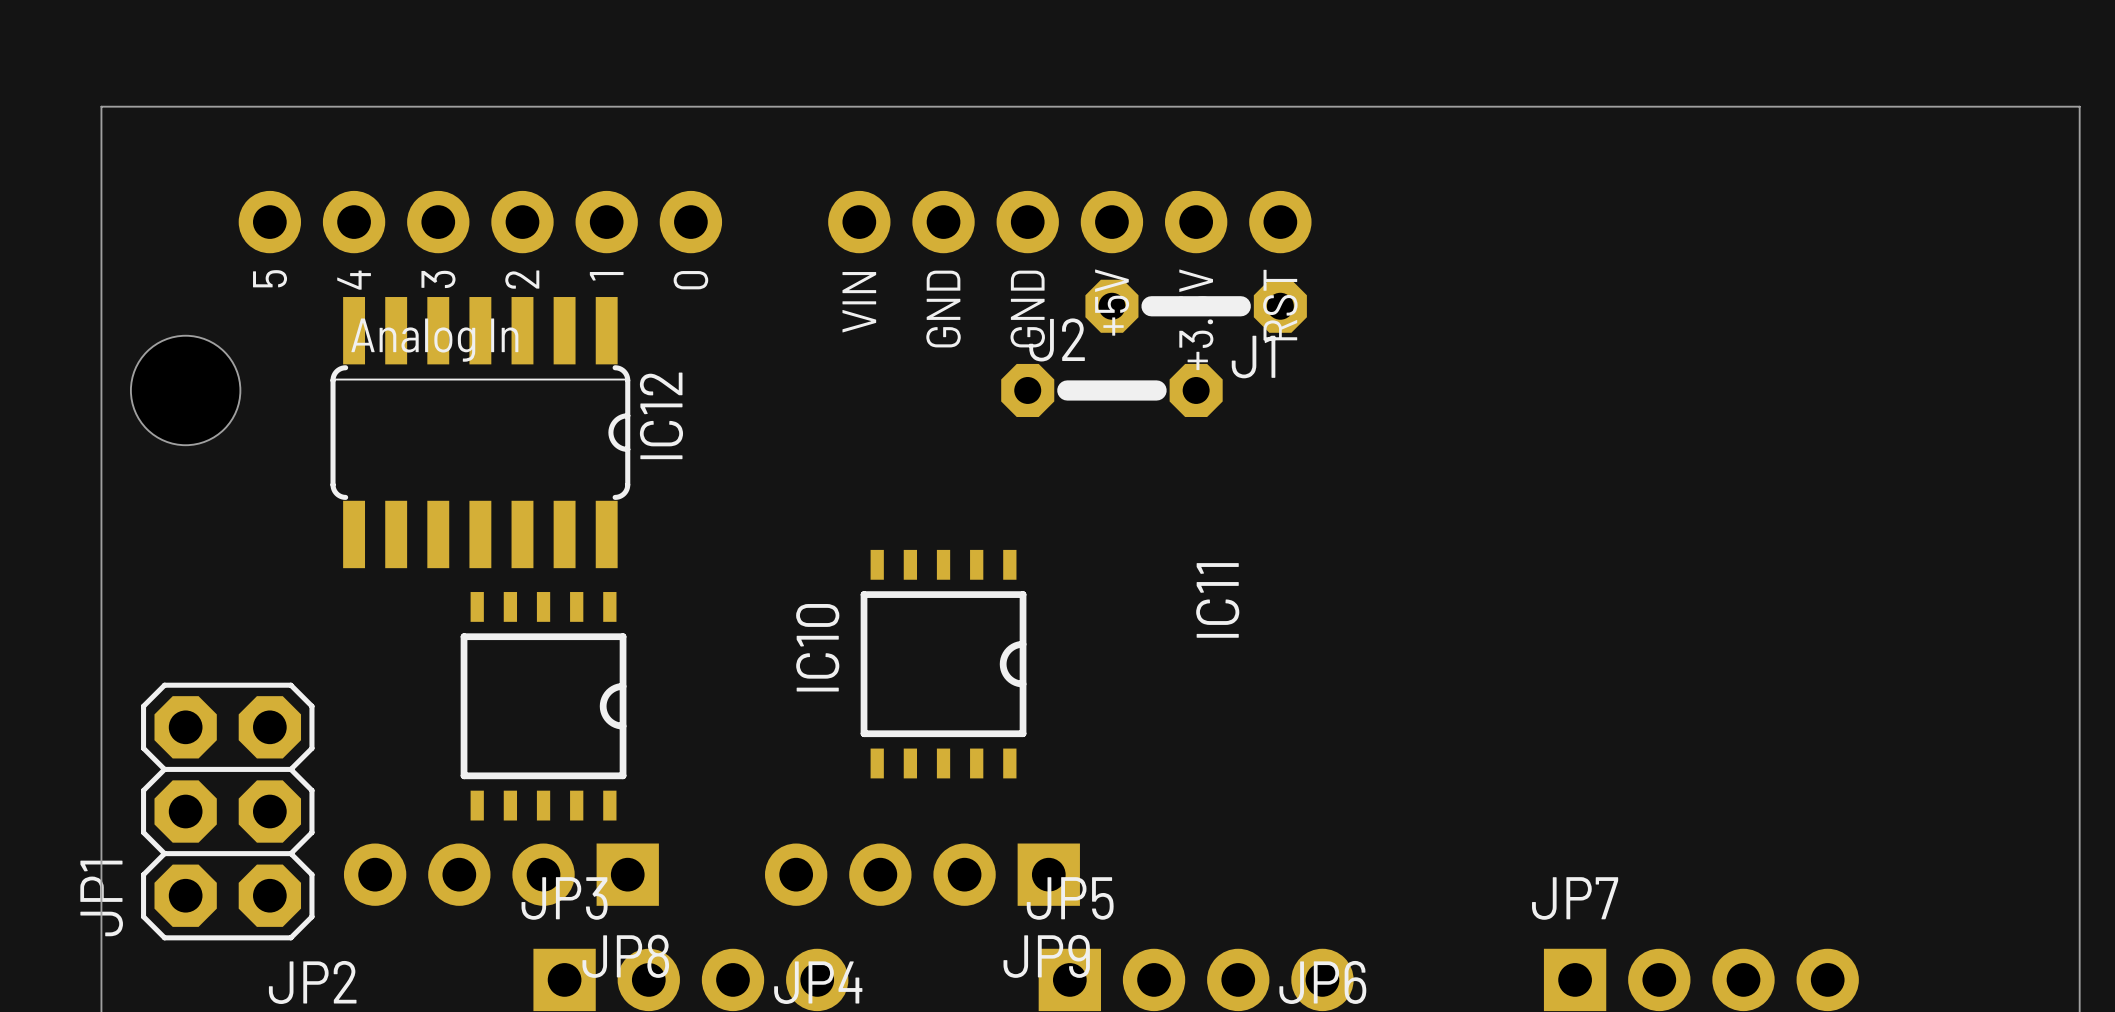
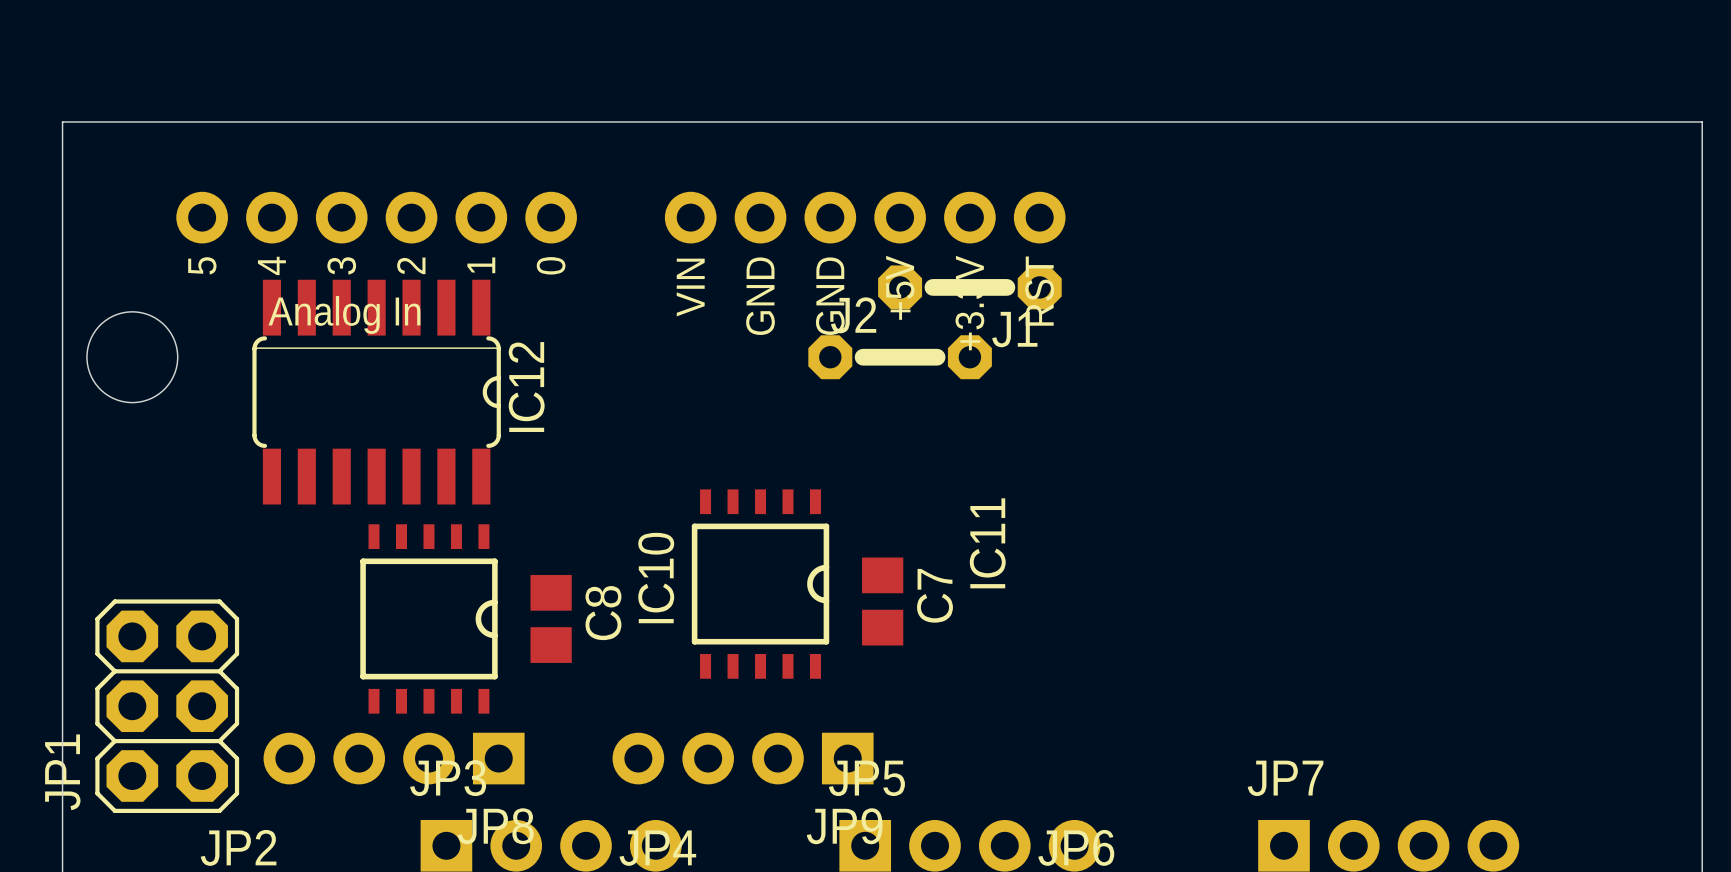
C7: none -> (882, 601)
C8: none -> (551, 618)

